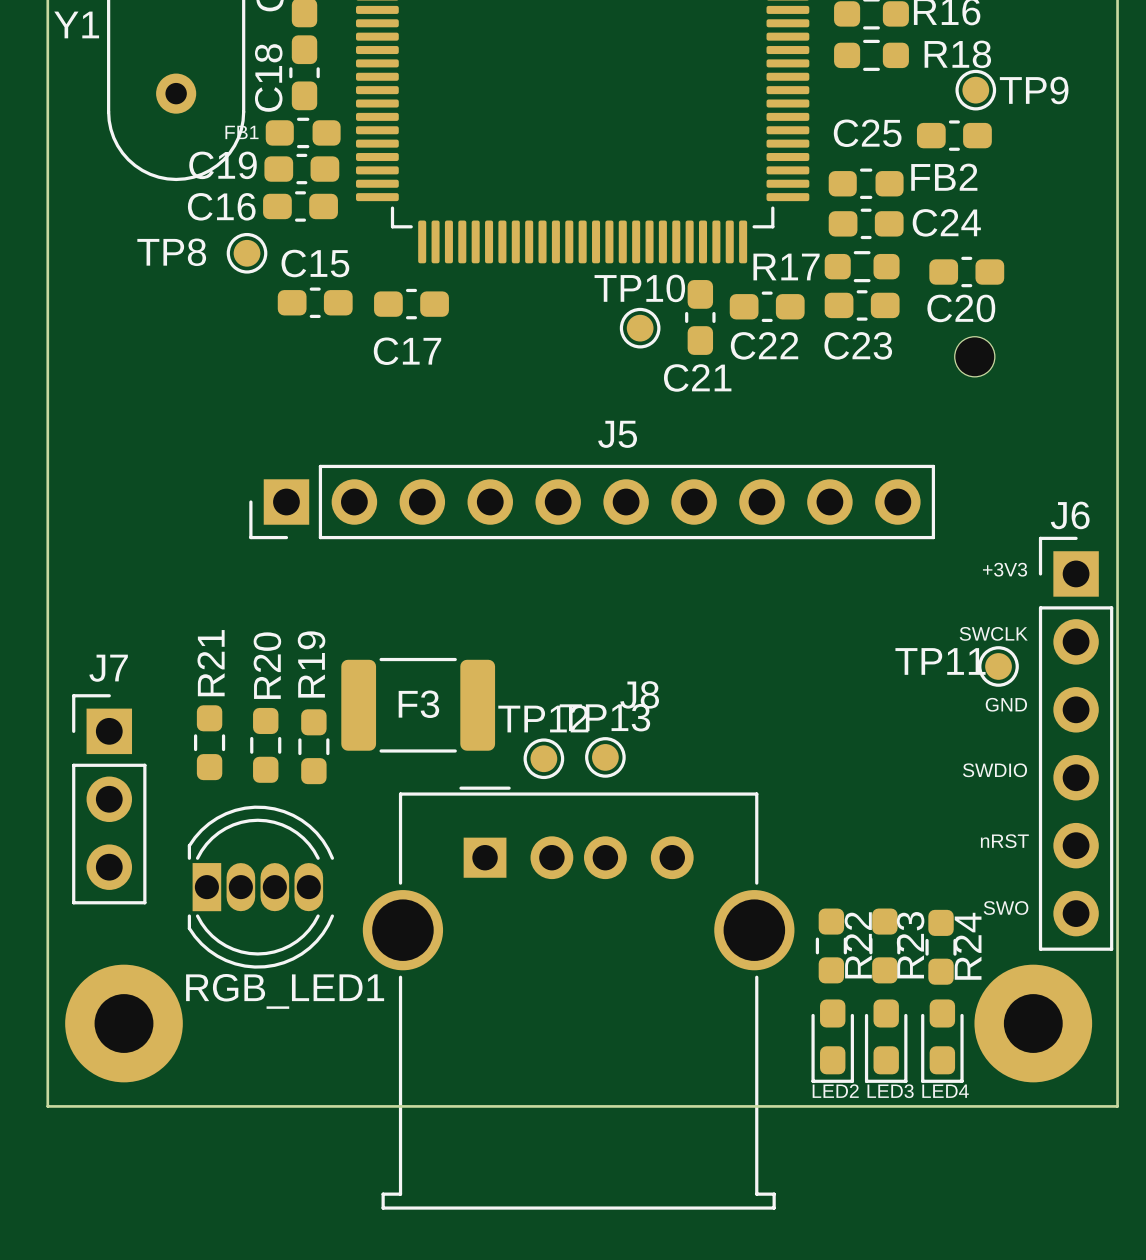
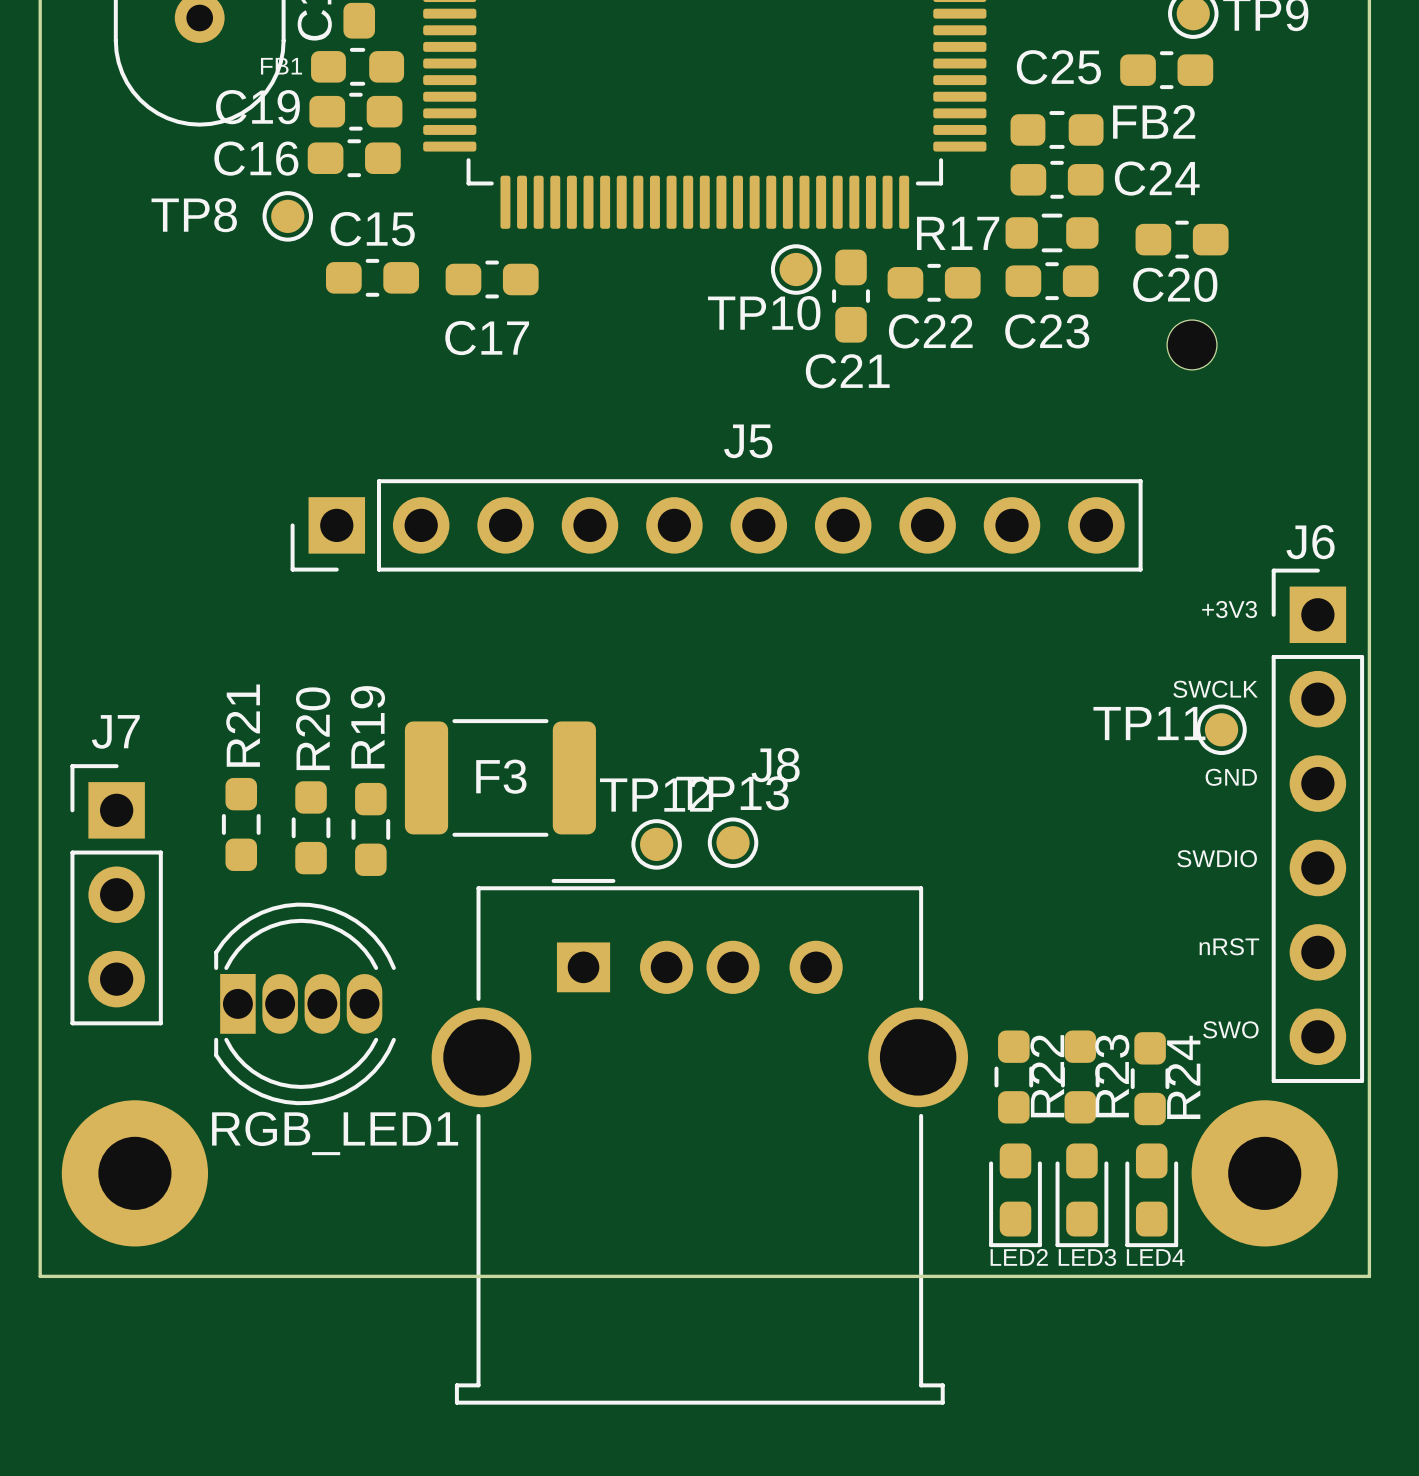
TP10 name position: TP10 (639, 288) -> TP10 (764, 313)
TP10 position: (640, 328) -> (796, 269)

